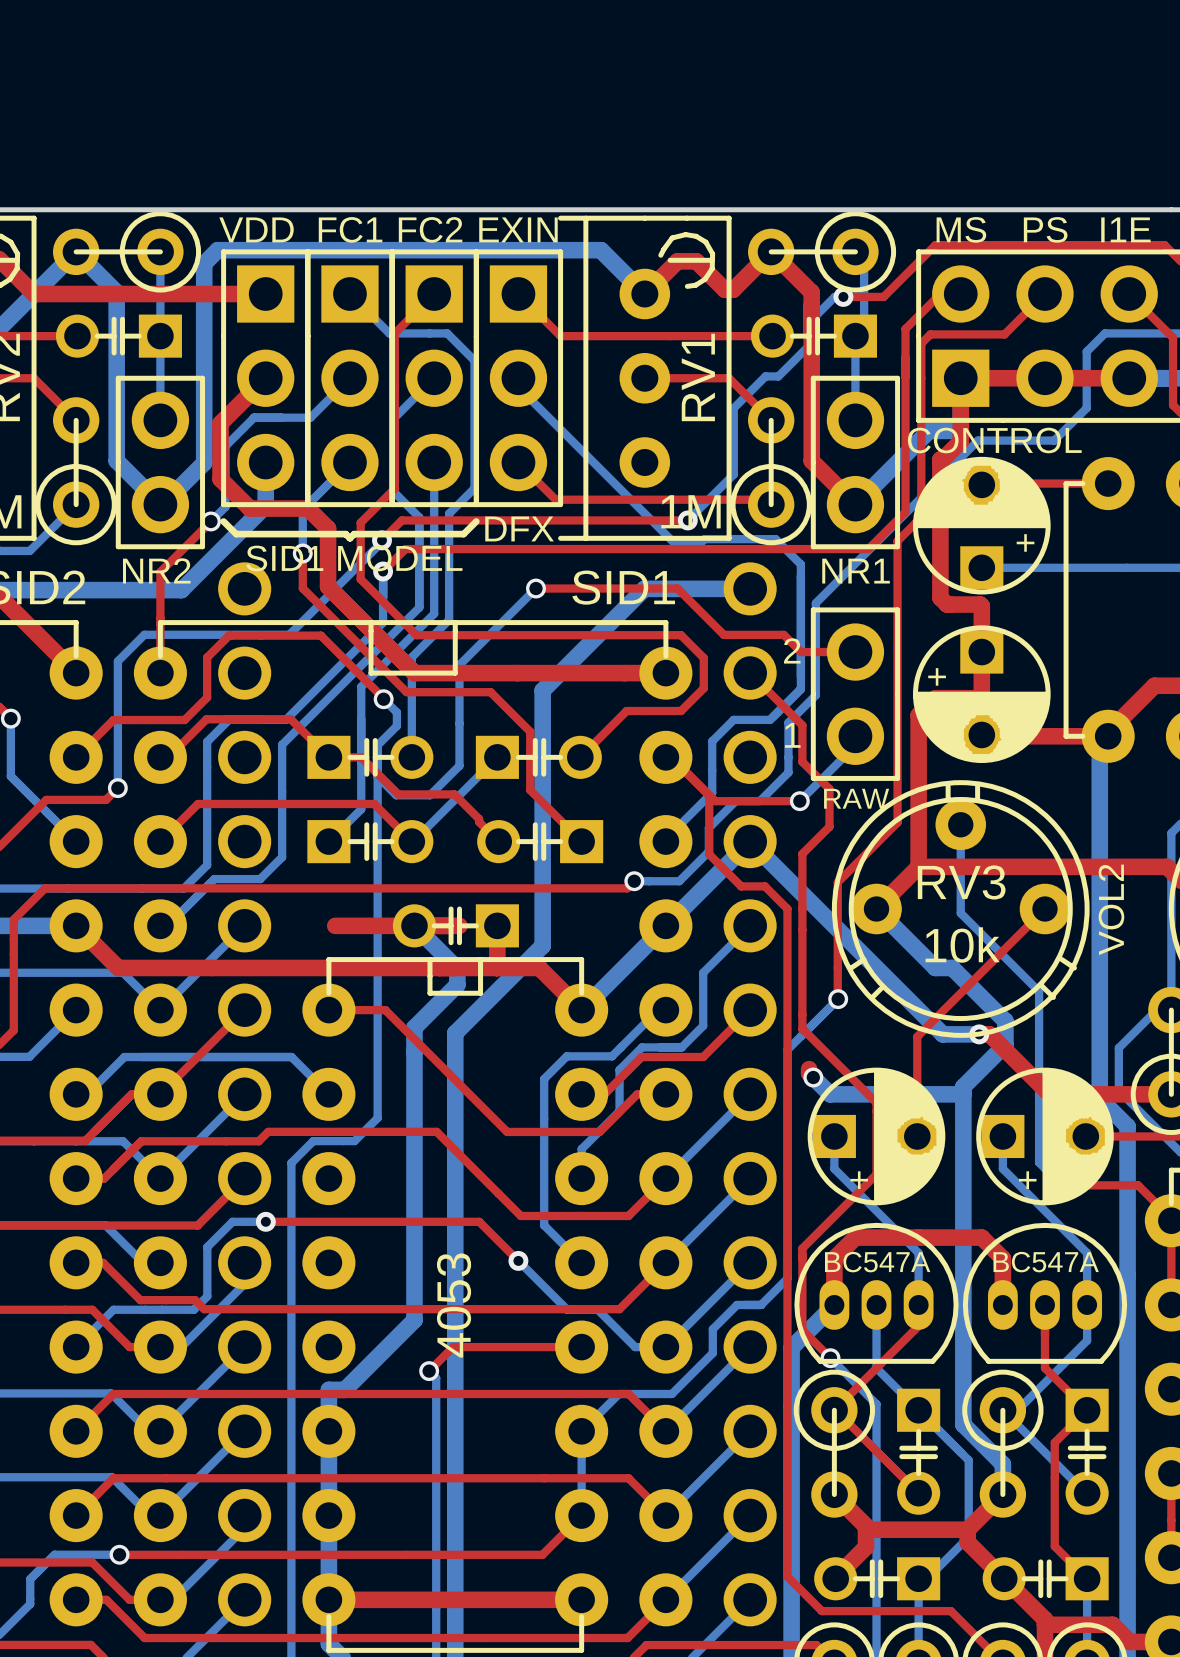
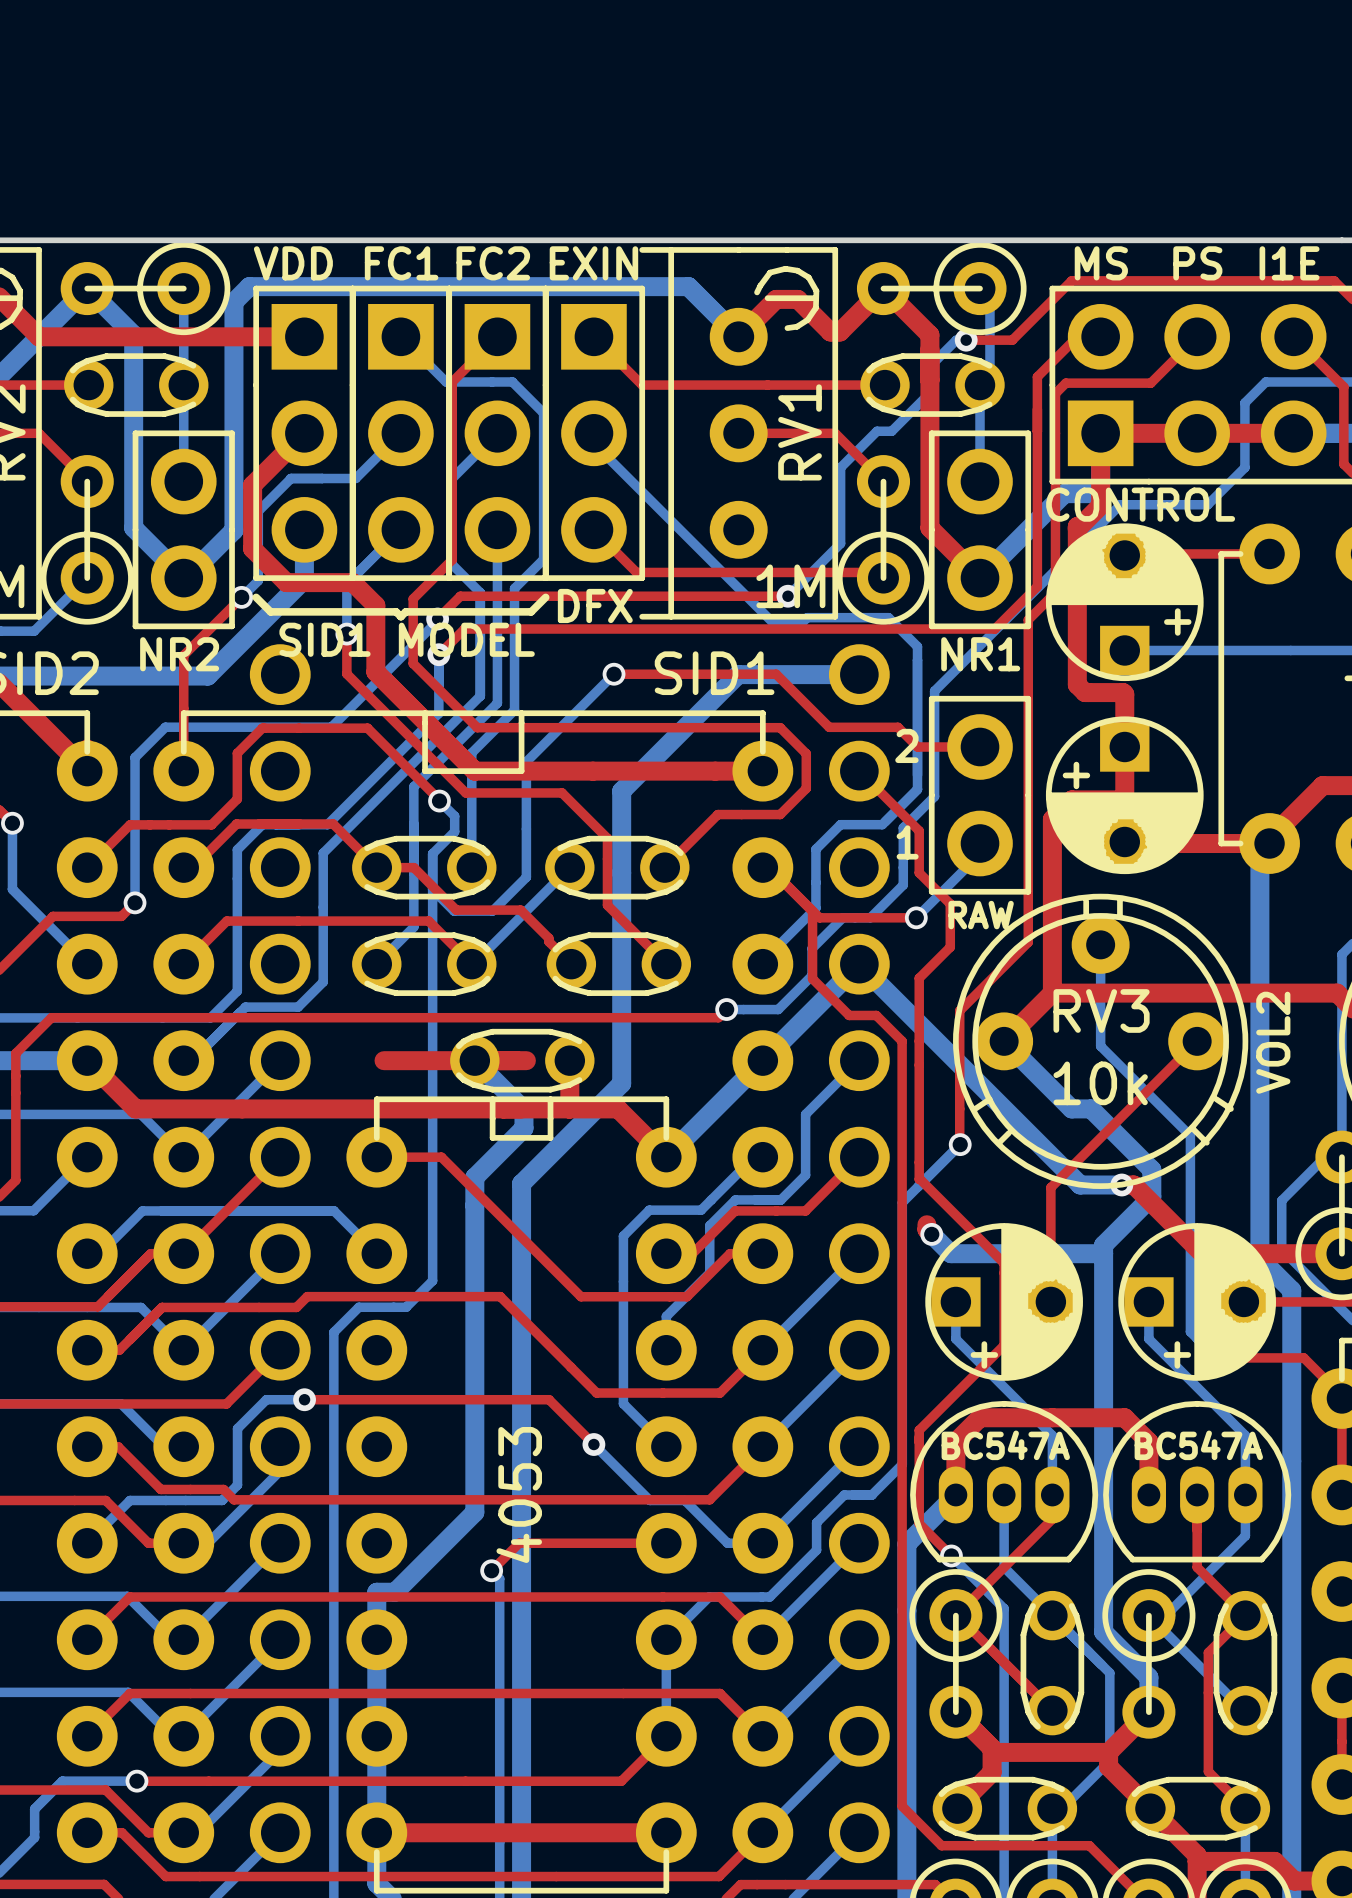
part footprint: [55, 314, 182, 358] -> [64, 353, 209, 417]
part footprint: [750, 314, 878, 358] -> [860, 353, 1005, 417]
part footprint: [307, 735, 434, 779] -> [352, 835, 497, 900]
part footprint: [475, 735, 602, 779] -> [545, 835, 690, 900]
part footprint: [307, 820, 434, 864] -> [352, 932, 497, 996]
part footprint: [477, 820, 604, 864] -> [546, 932, 692, 996]
part footprint: [392, 904, 519, 948] -> [450, 1028, 595, 1093]
part footprint: [897, 1388, 941, 1515] -> [1020, 1590, 1085, 1736]
part footprint: [1065, 1388, 1109, 1515] -> [1213, 1590, 1278, 1736]
part footprint: [814, 1557, 941, 1601] -> [932, 1776, 1078, 1841]
part footprint: [982, 1557, 1109, 1601] -> [1125, 1776, 1271, 1841]

